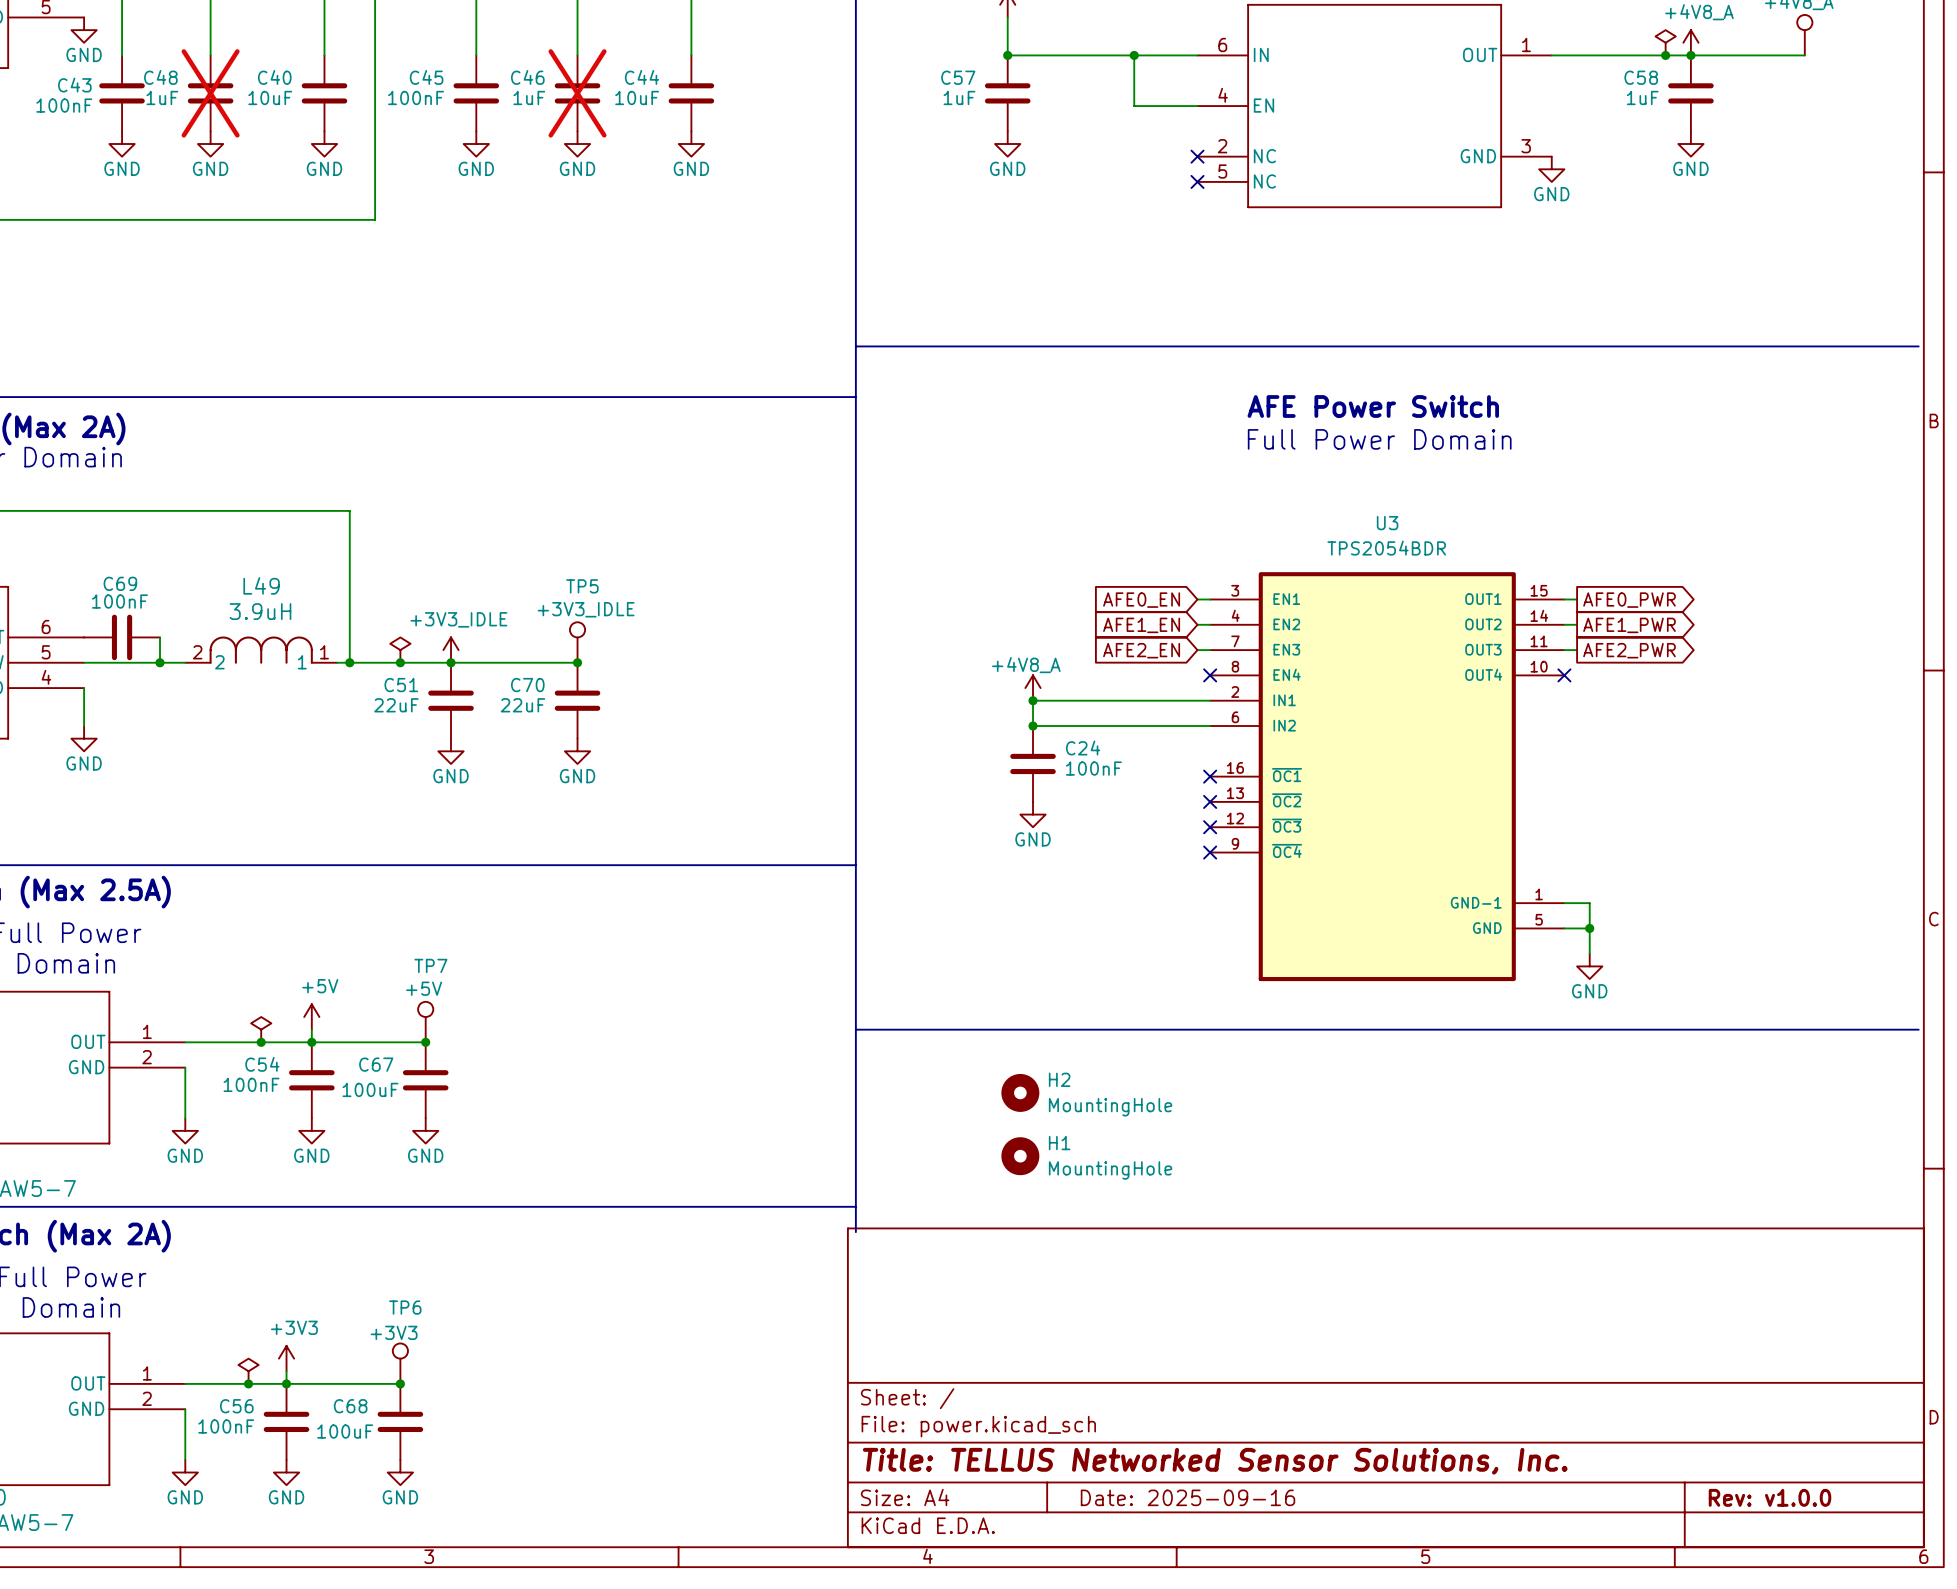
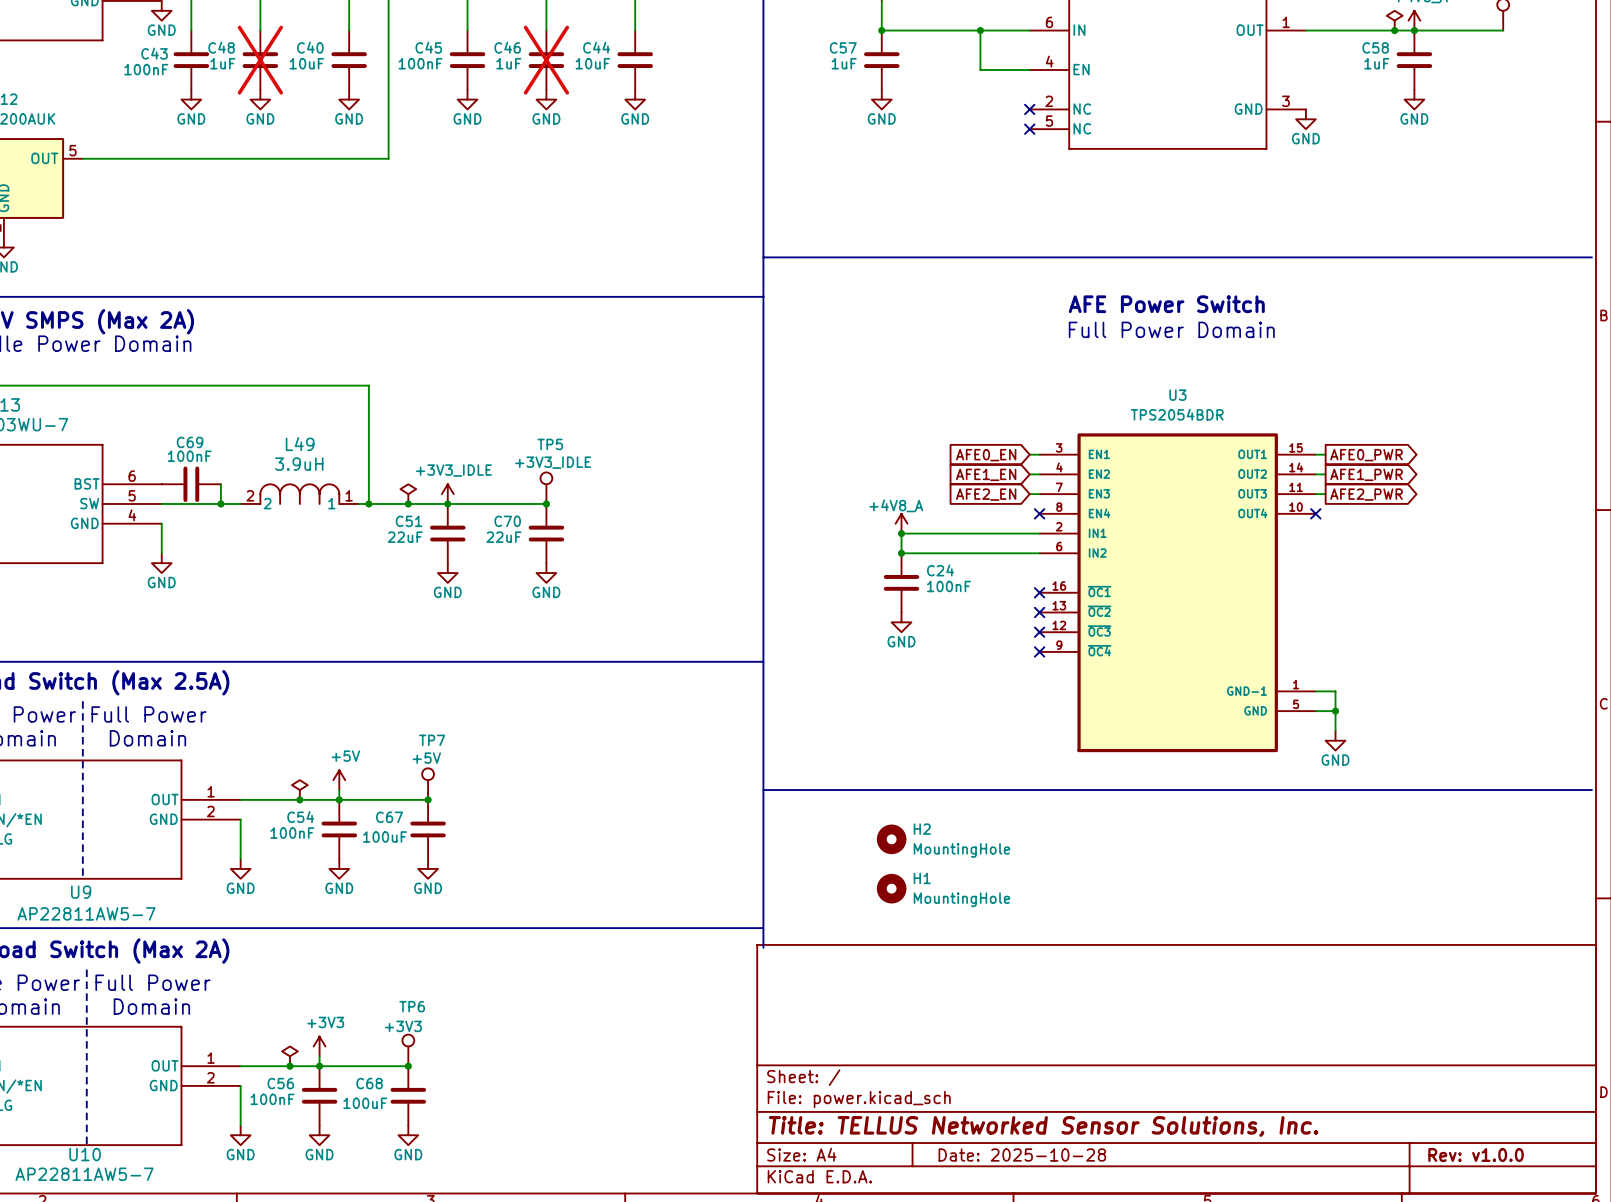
title block: Date: 2025-09-16 (1187, 1497) -> Date: 2025-10-28 (1022, 1155)

